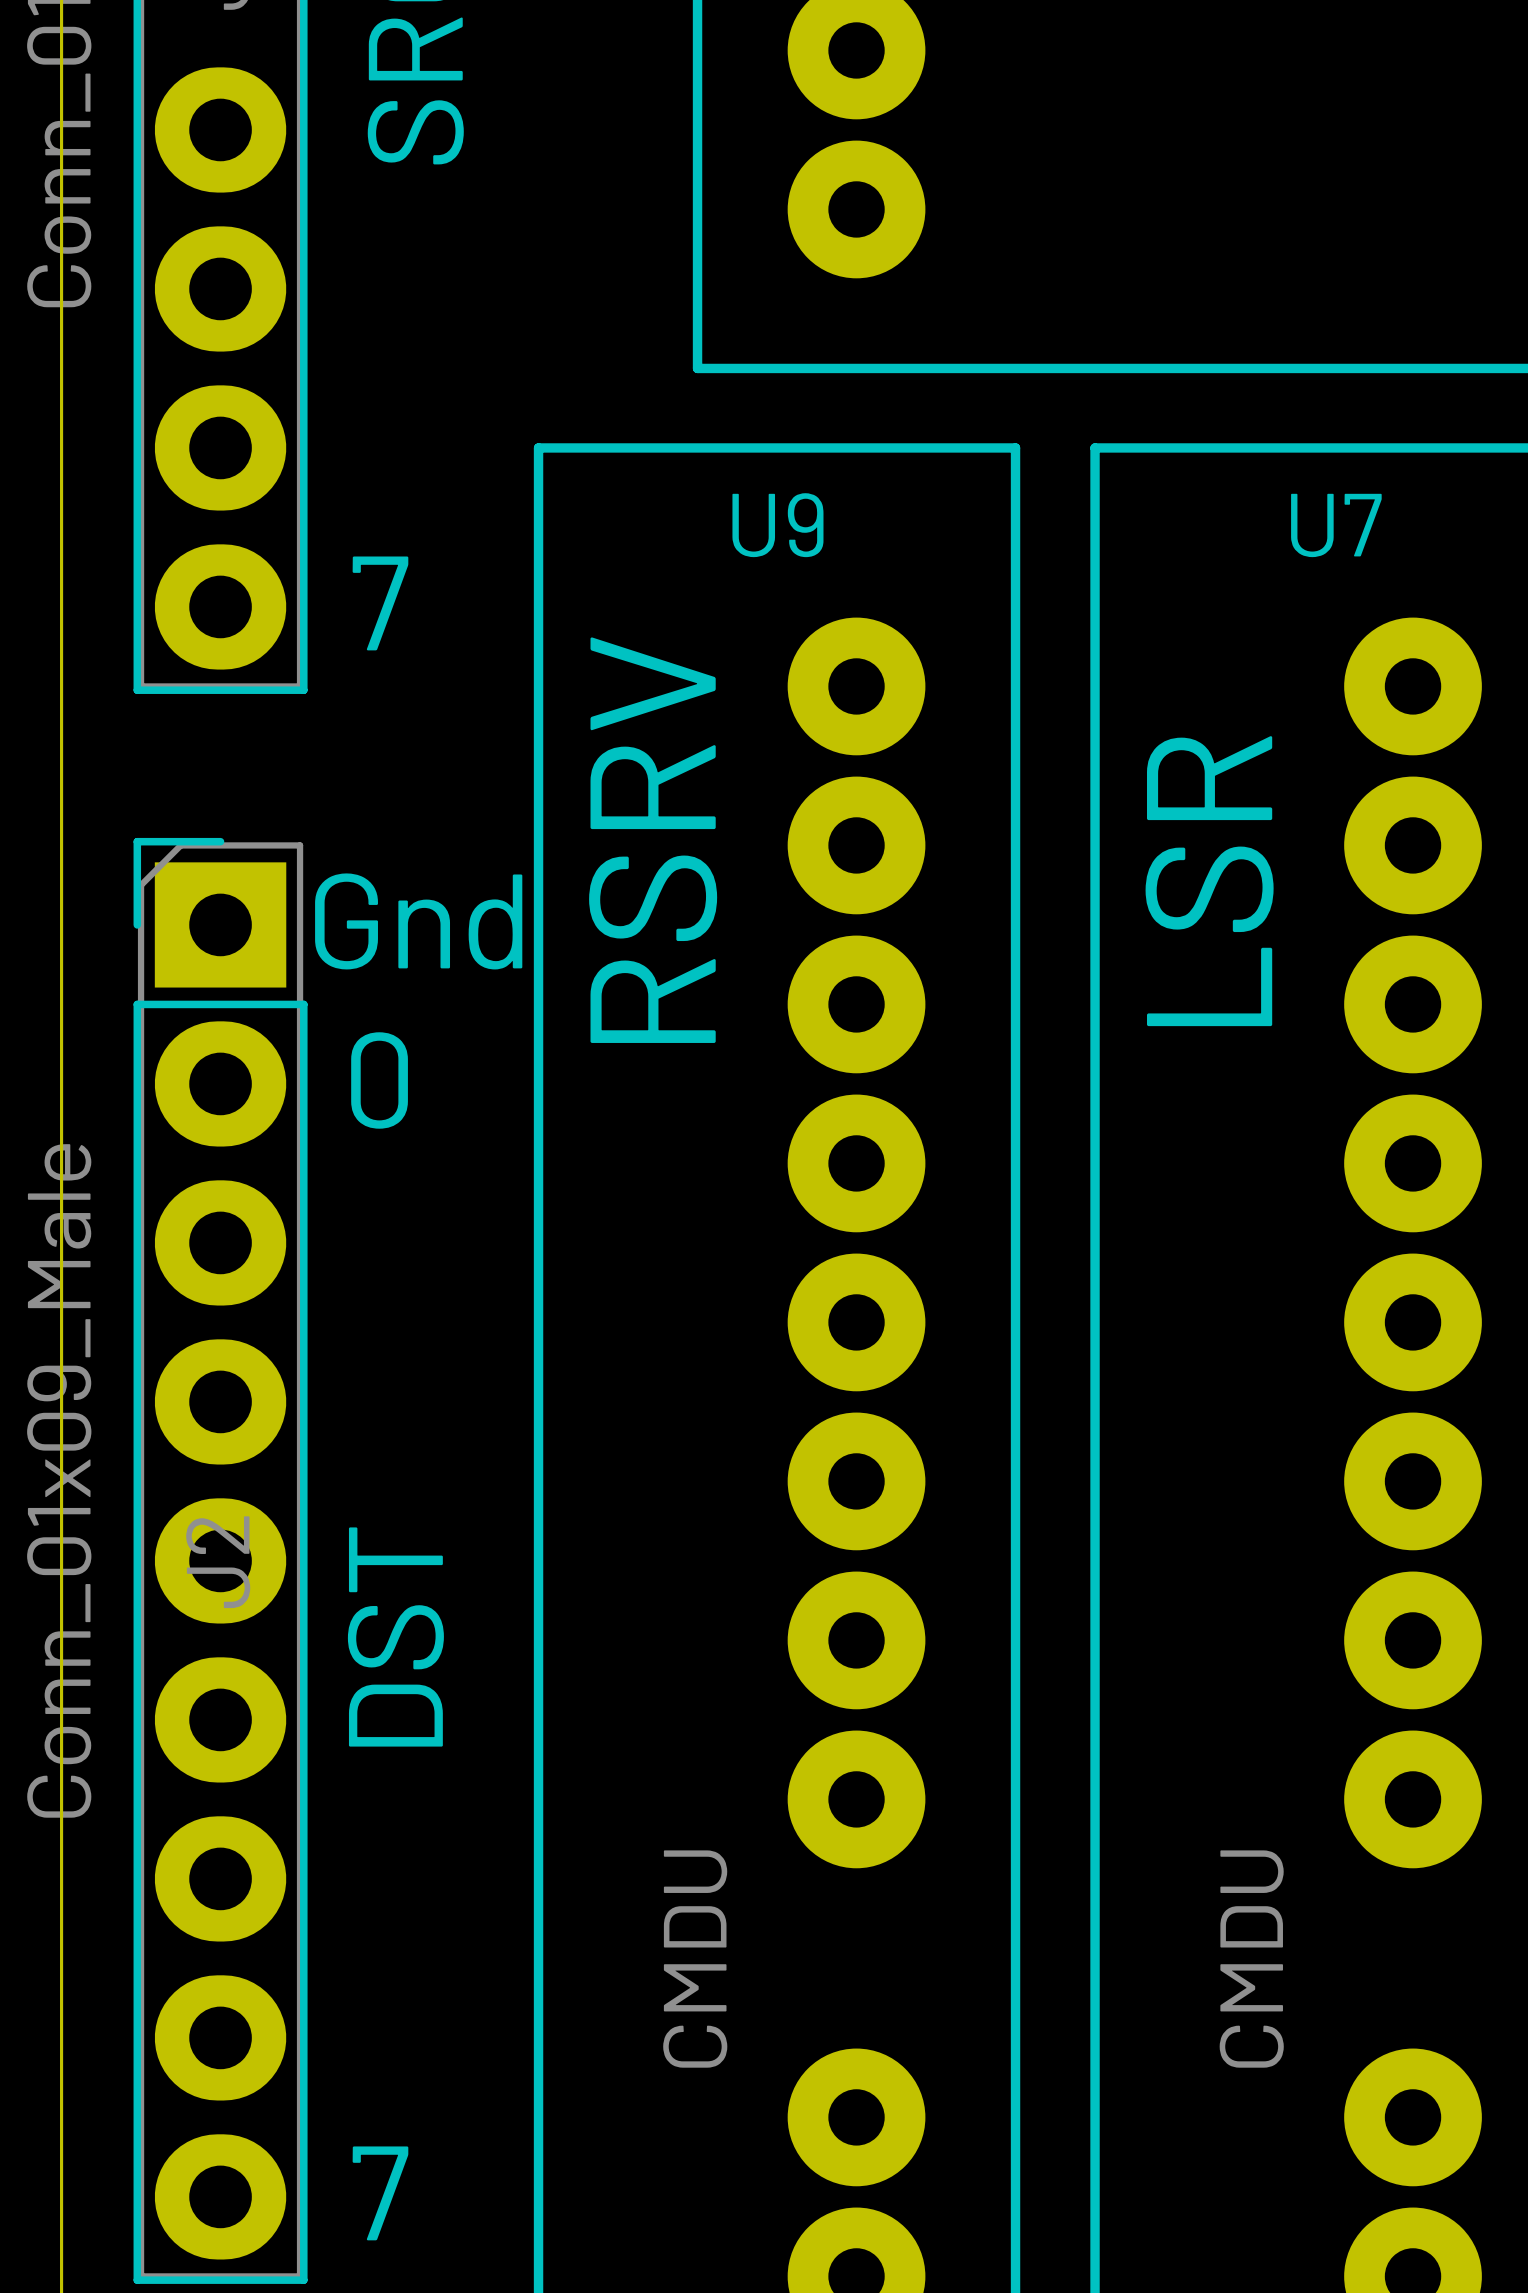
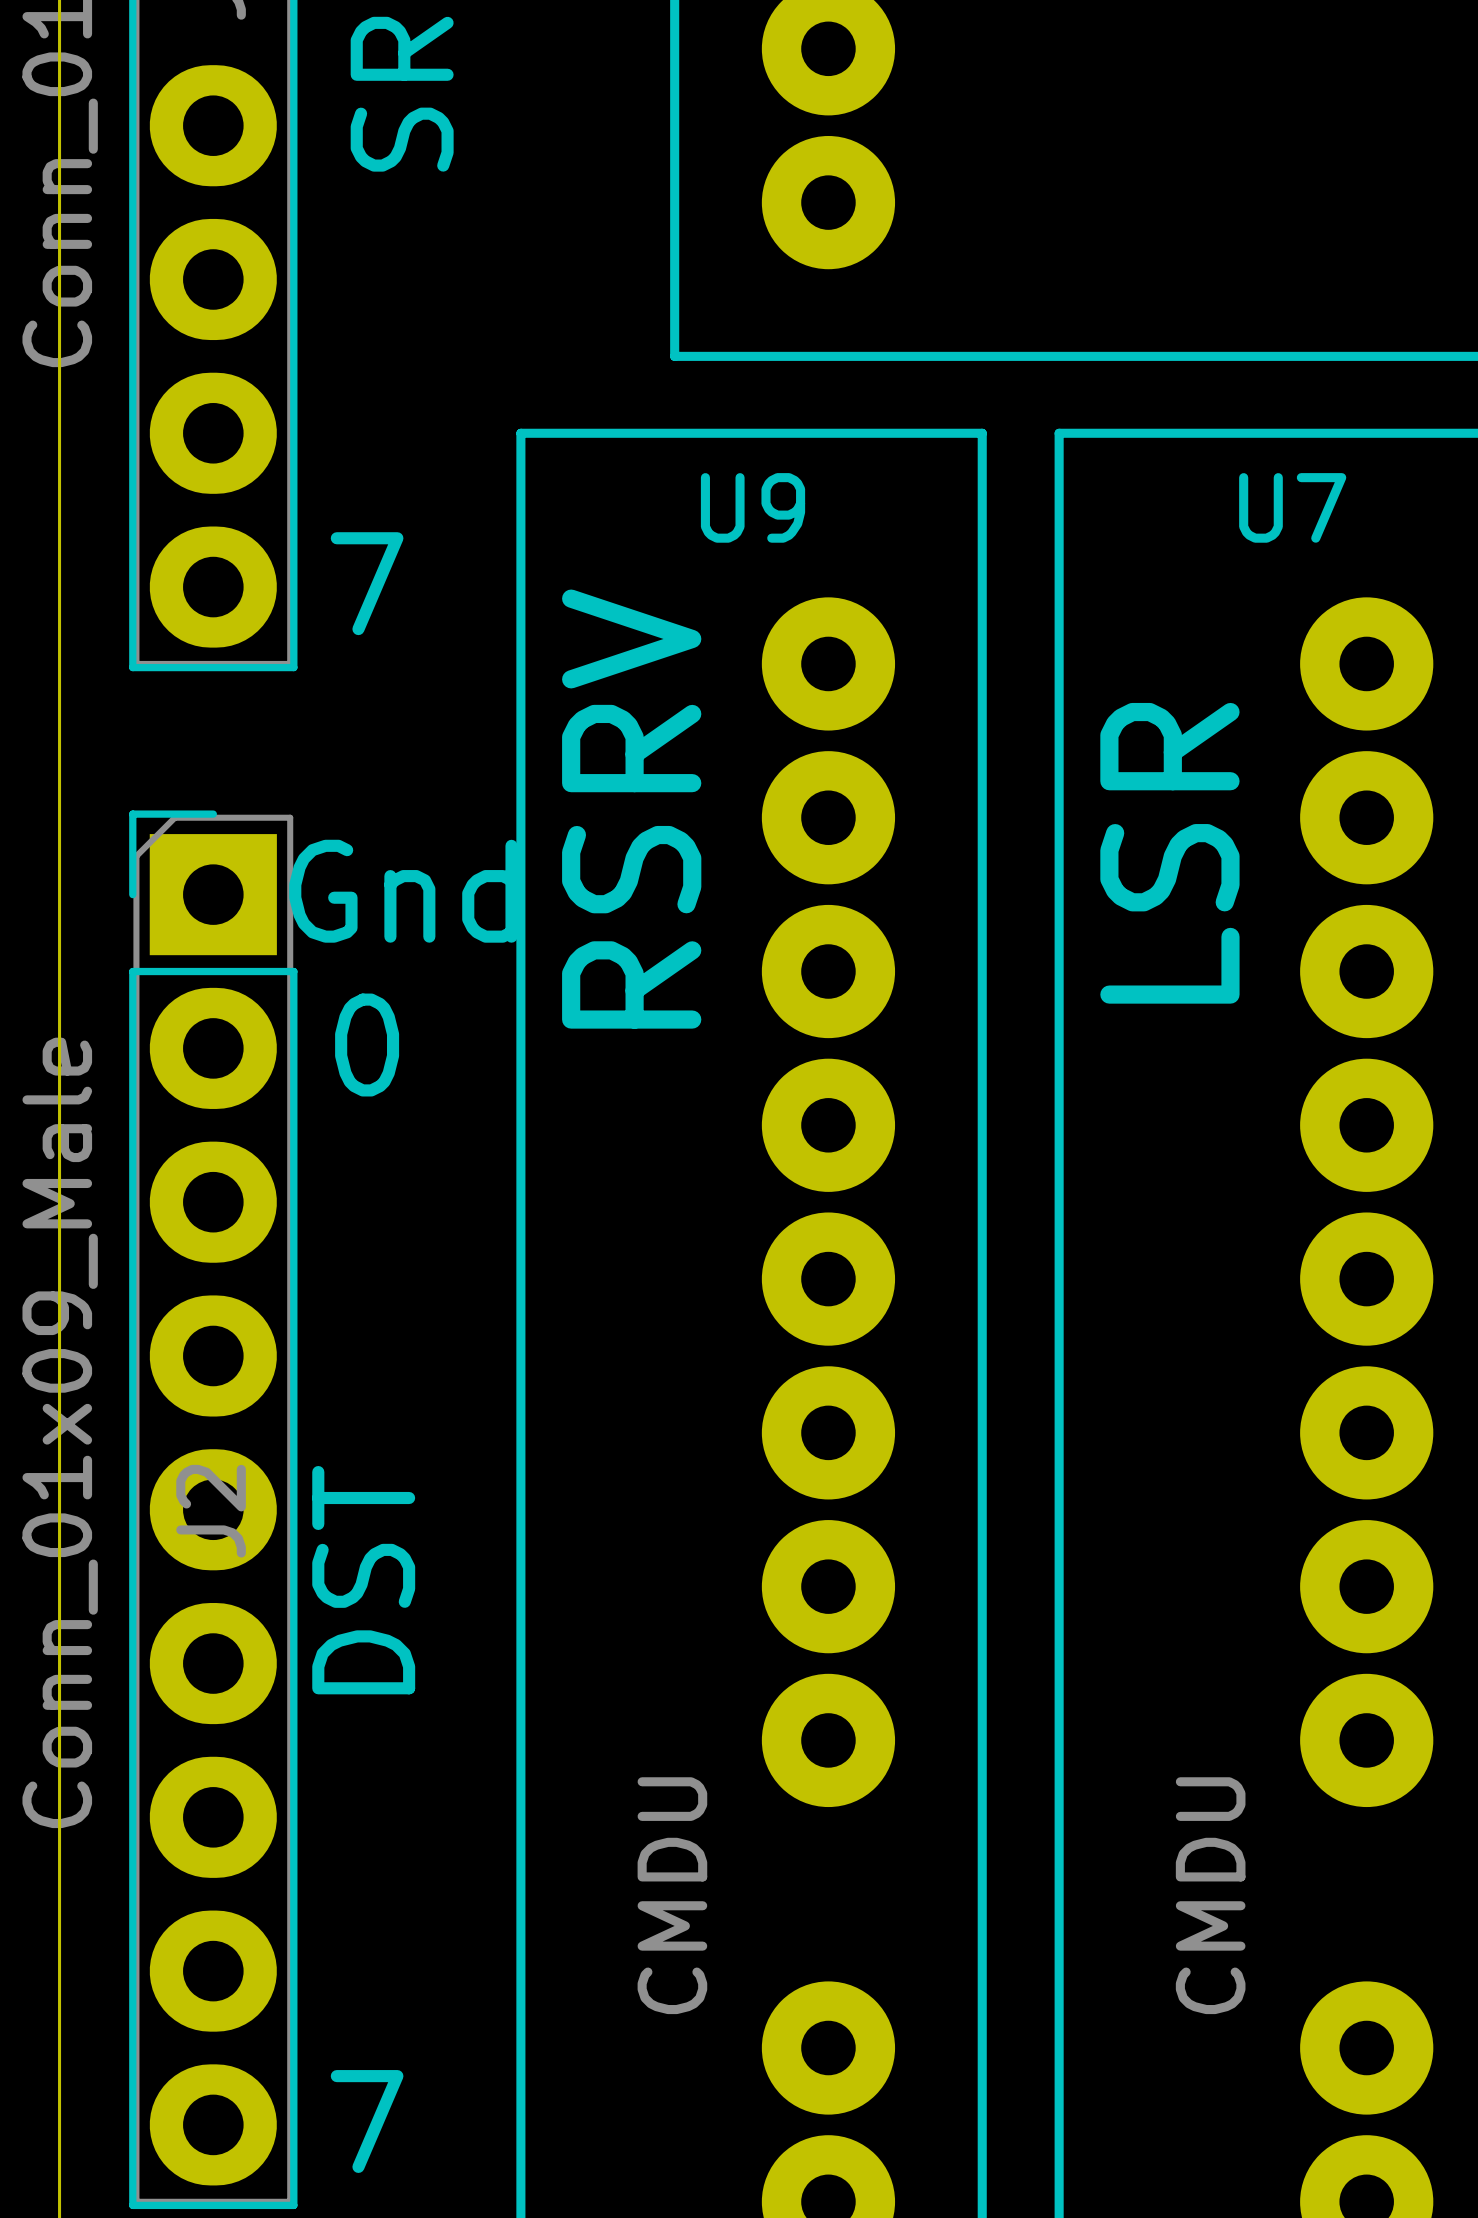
text position: DST (395, 1637) -> DST (363, 1580)

